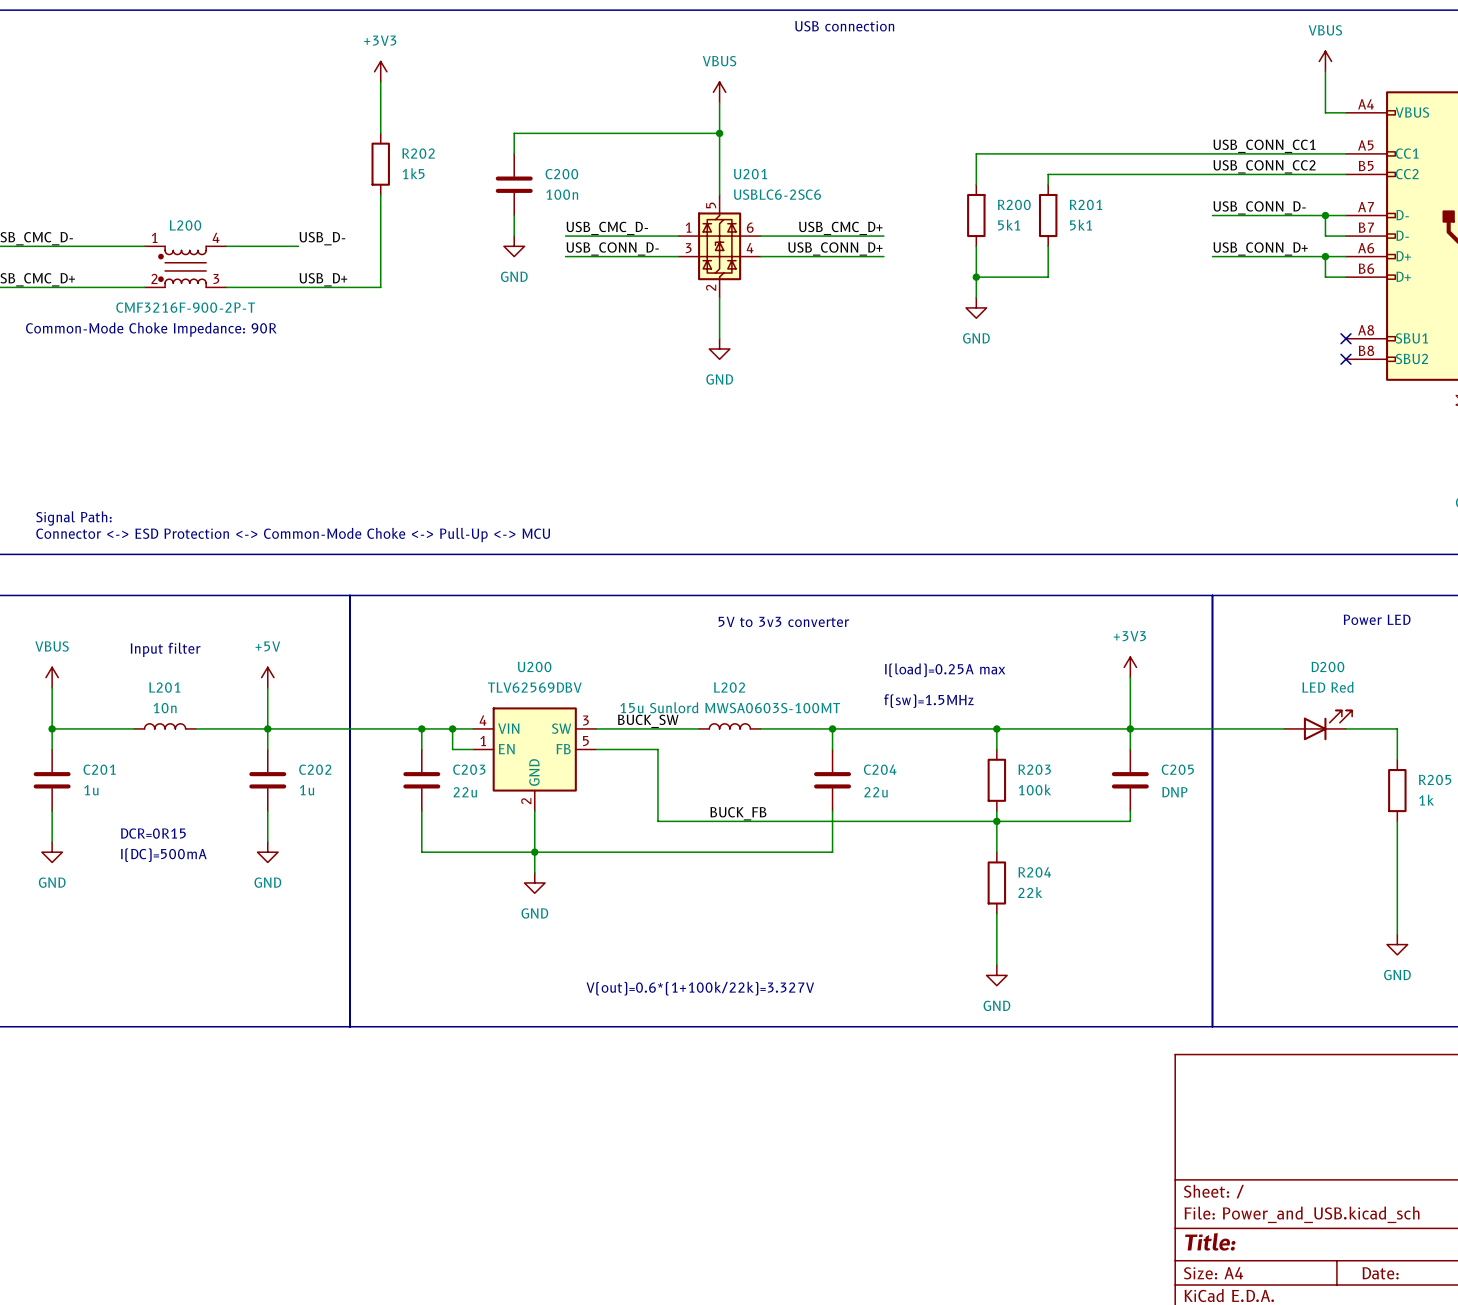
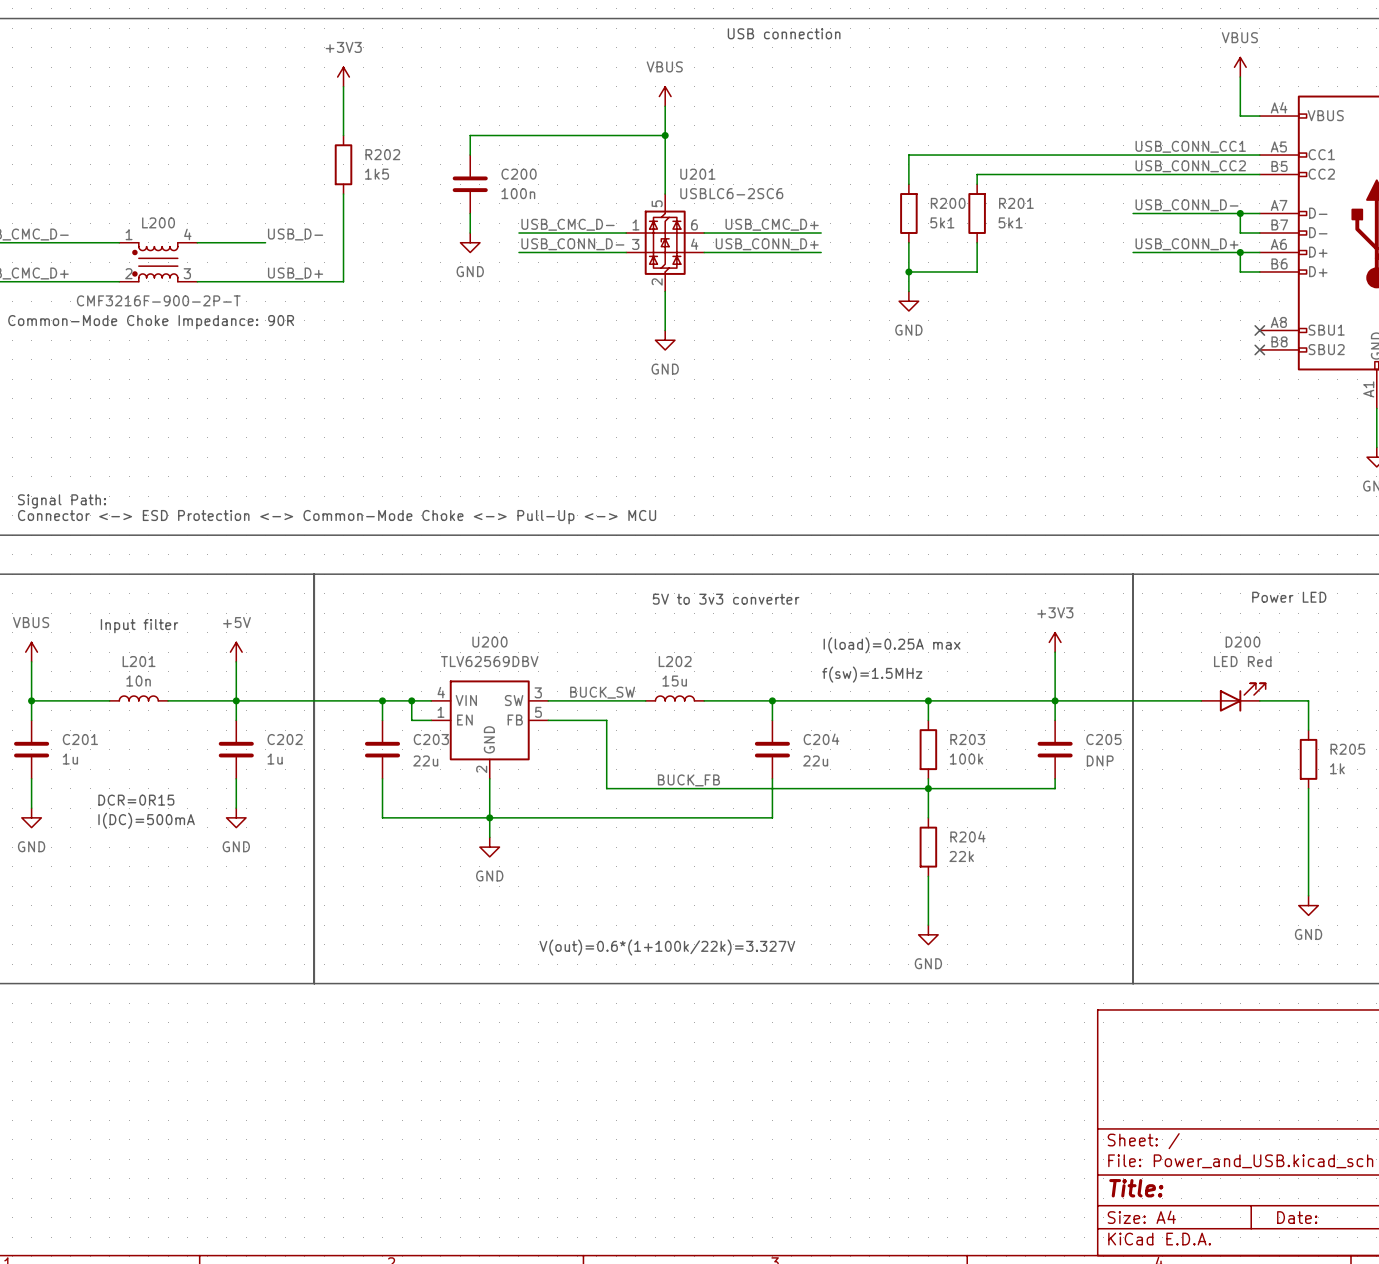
L202 value: 15u Sunlord MWSA0603S-100MT (730, 707) -> 15u (674, 681)

